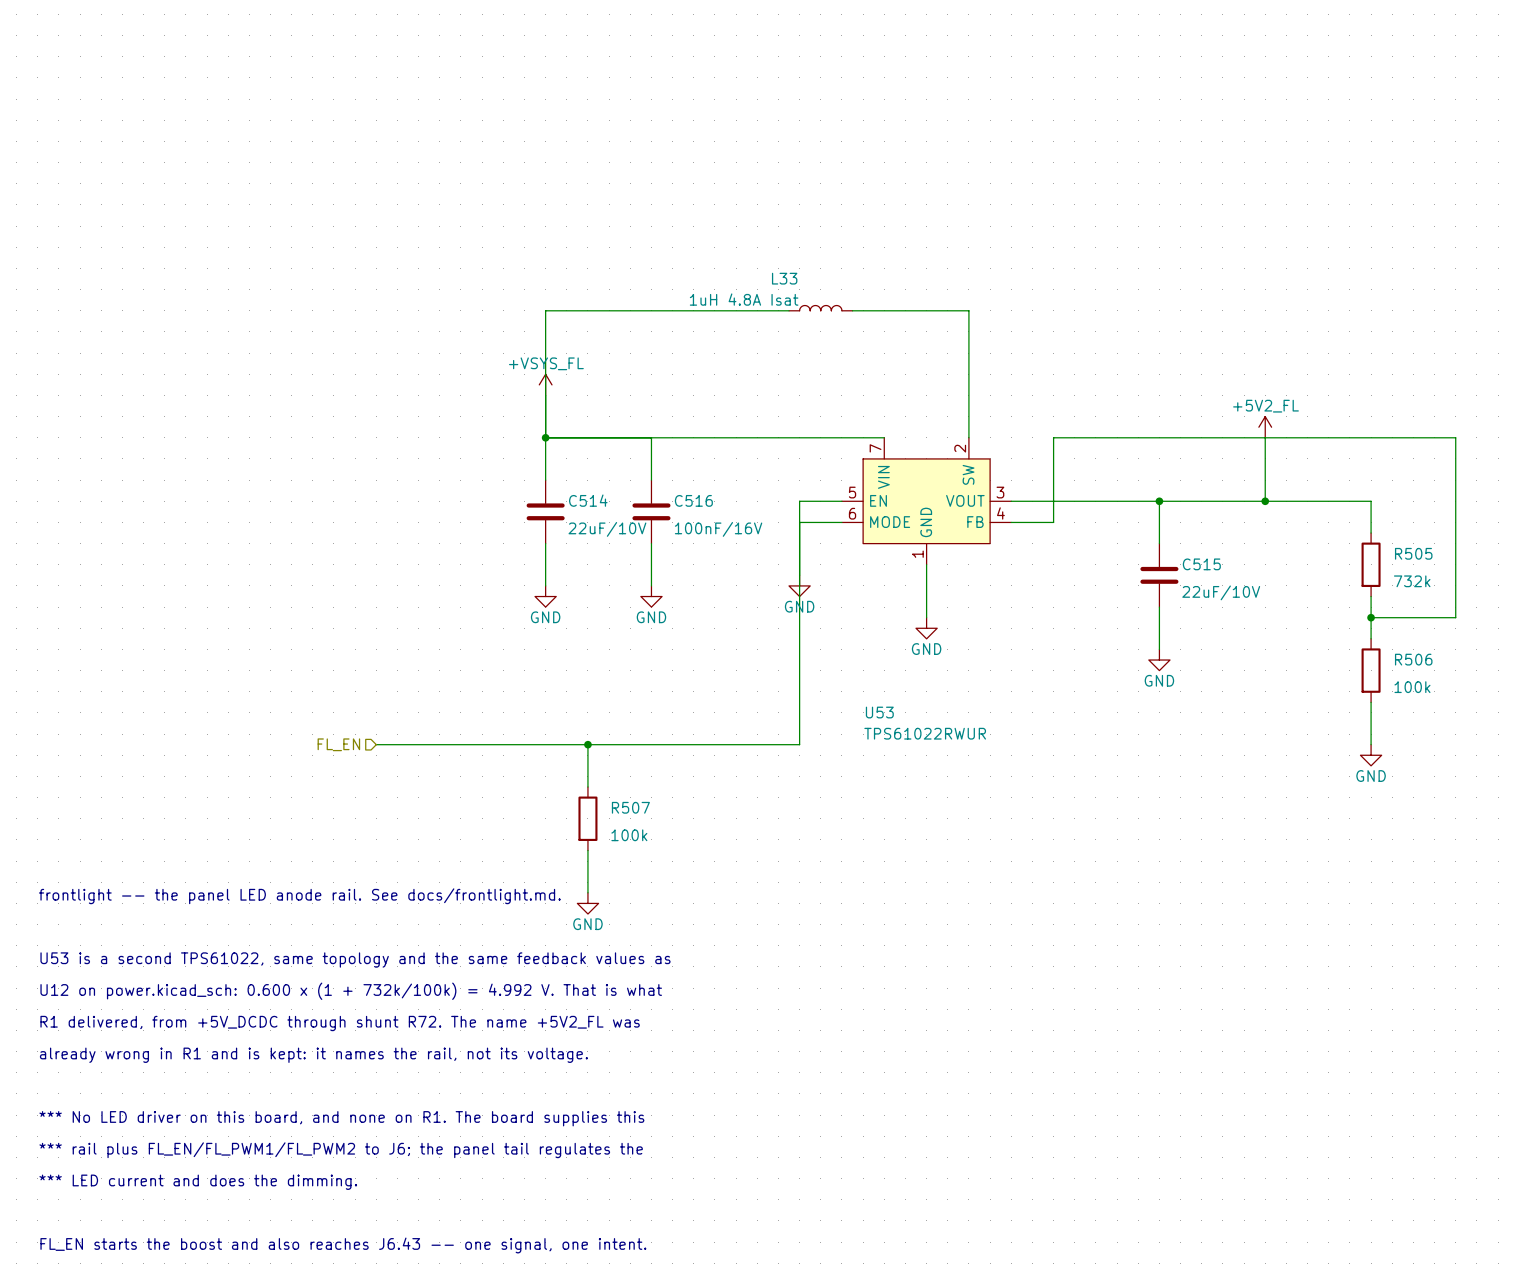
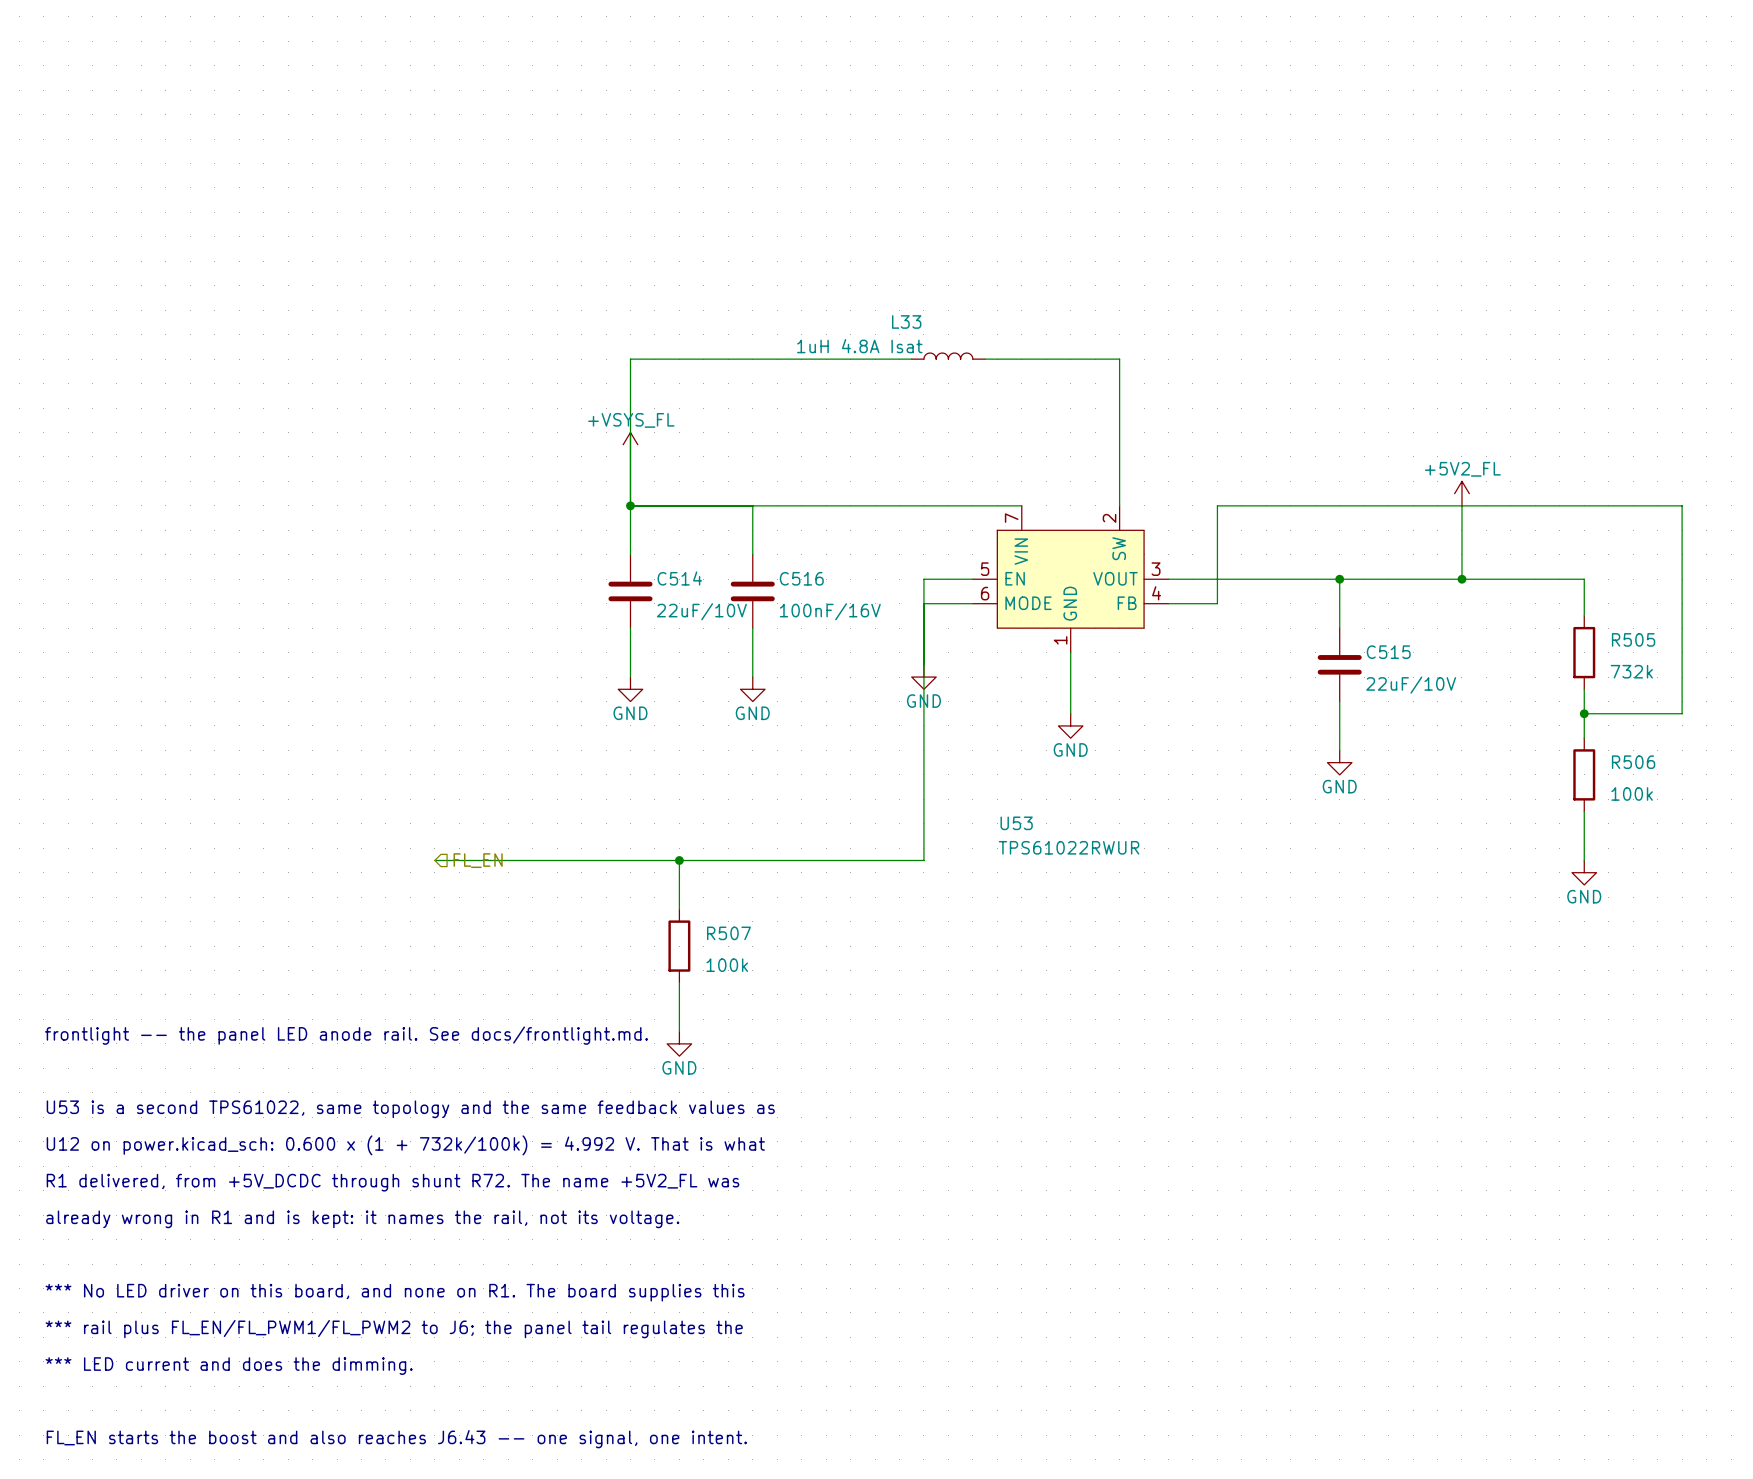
hierarchical label rotation: 0° (338, 744) -> 180° (478, 860)
hierarchical label position: FL_EN (338, 744) -> FL_EN (478, 860)

